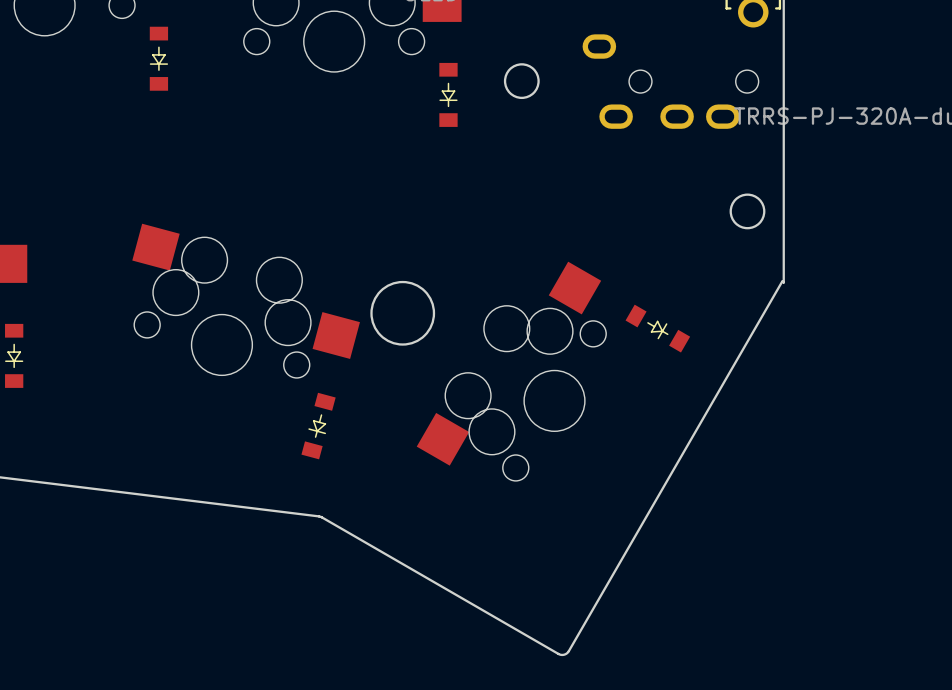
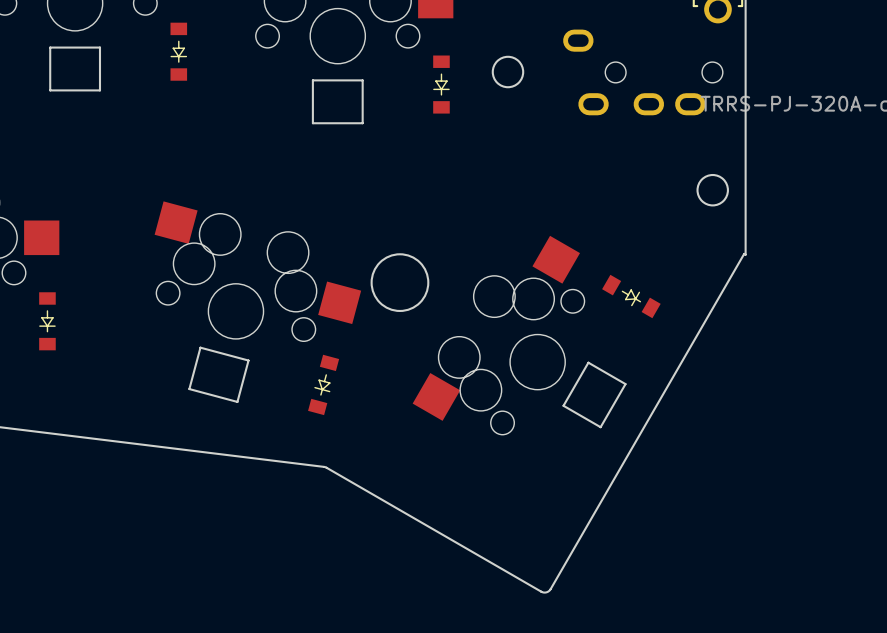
board edge: none -> (50, 47) (99, 47) (99, 90) (50, 90) (50, 47)
board edge: none -> (312, 80) (362, 80) (362, 123) (312, 123) (312, 80)
board edge: none -> (200, 347) (248, 360) (237, 401) (189, 389) (200, 347)
board edge: none -> (588, 362) (625, 384) (600, 427) (563, 405) (588, 362)

